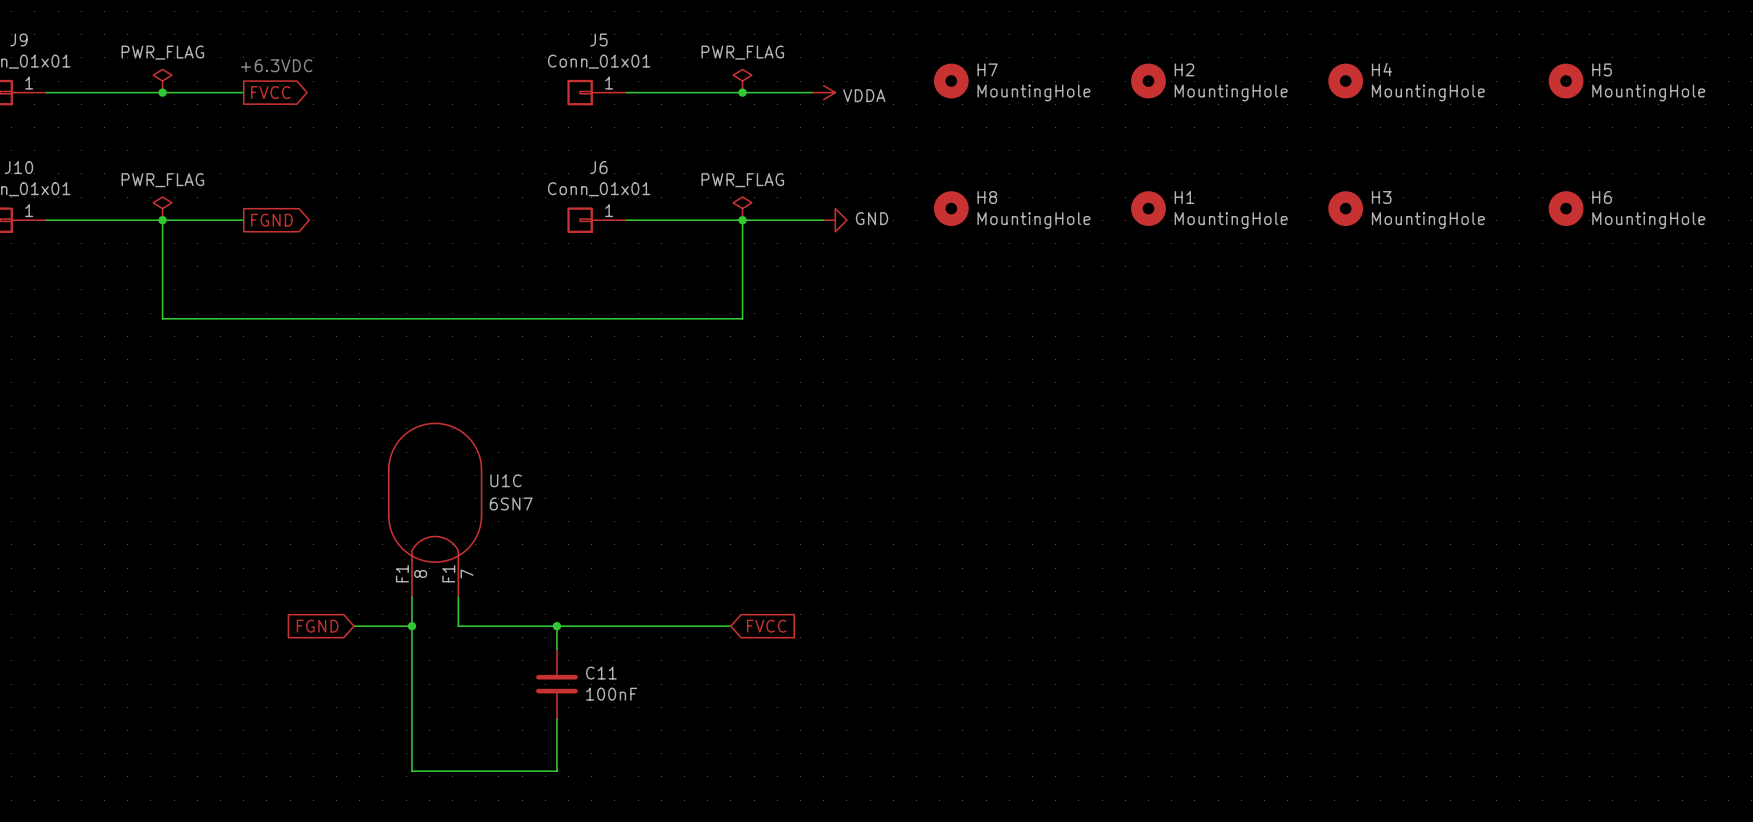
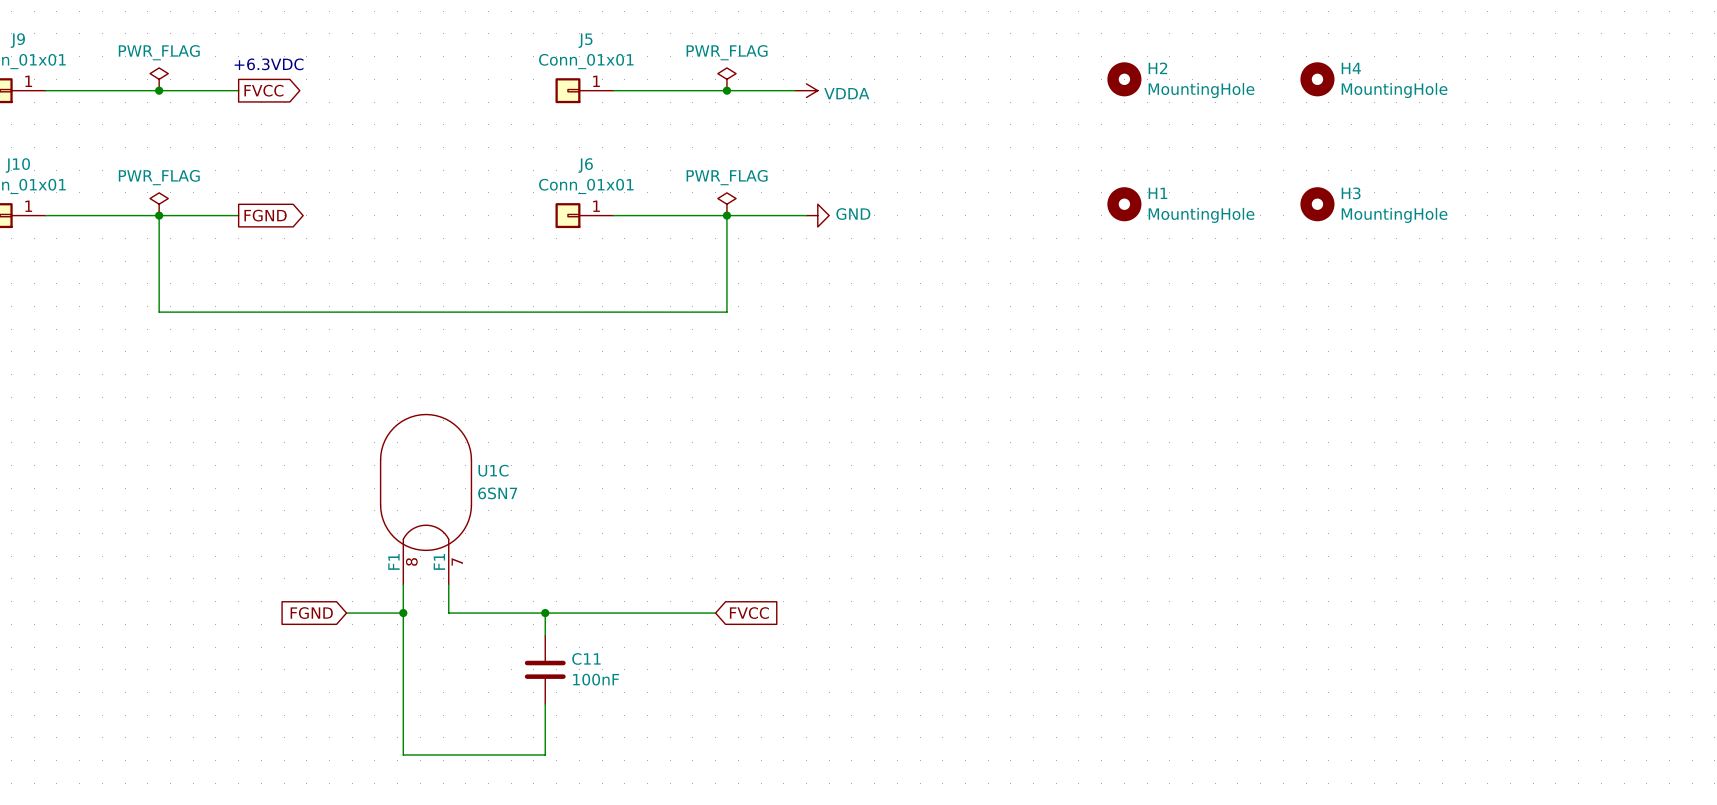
H7: MountingHole (951, 81) -> none
H5: MountingHole (1566, 81) -> none
H8: MountingHole (951, 208) -> none
H6: MountingHole (1566, 208) -> none

